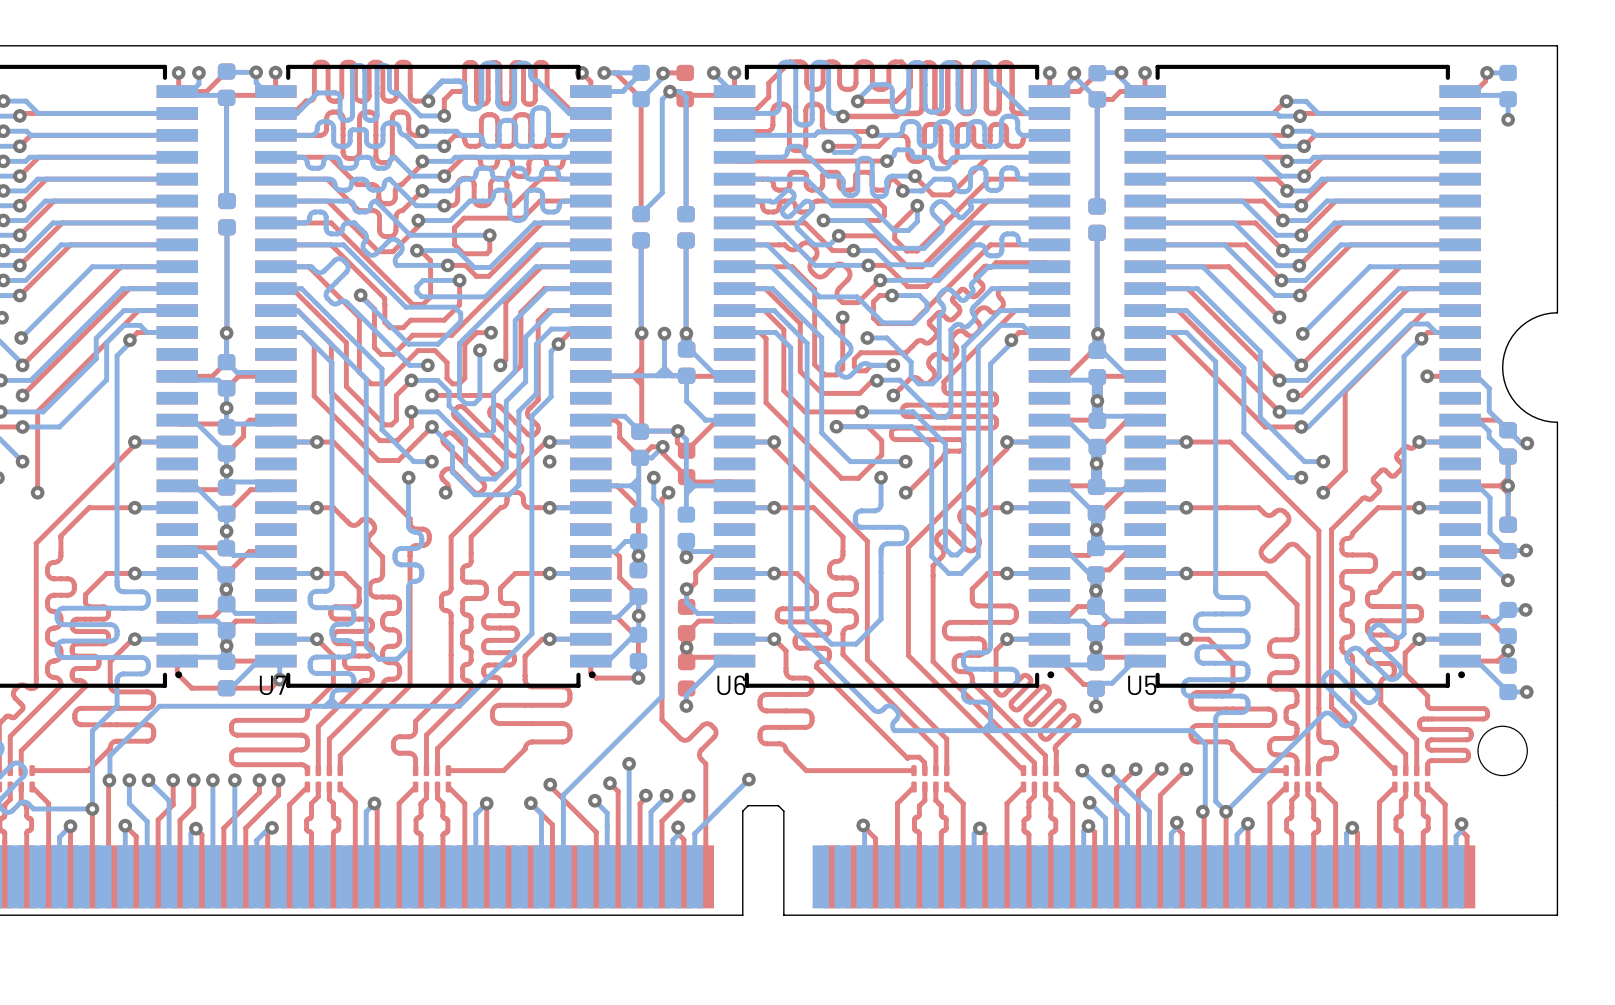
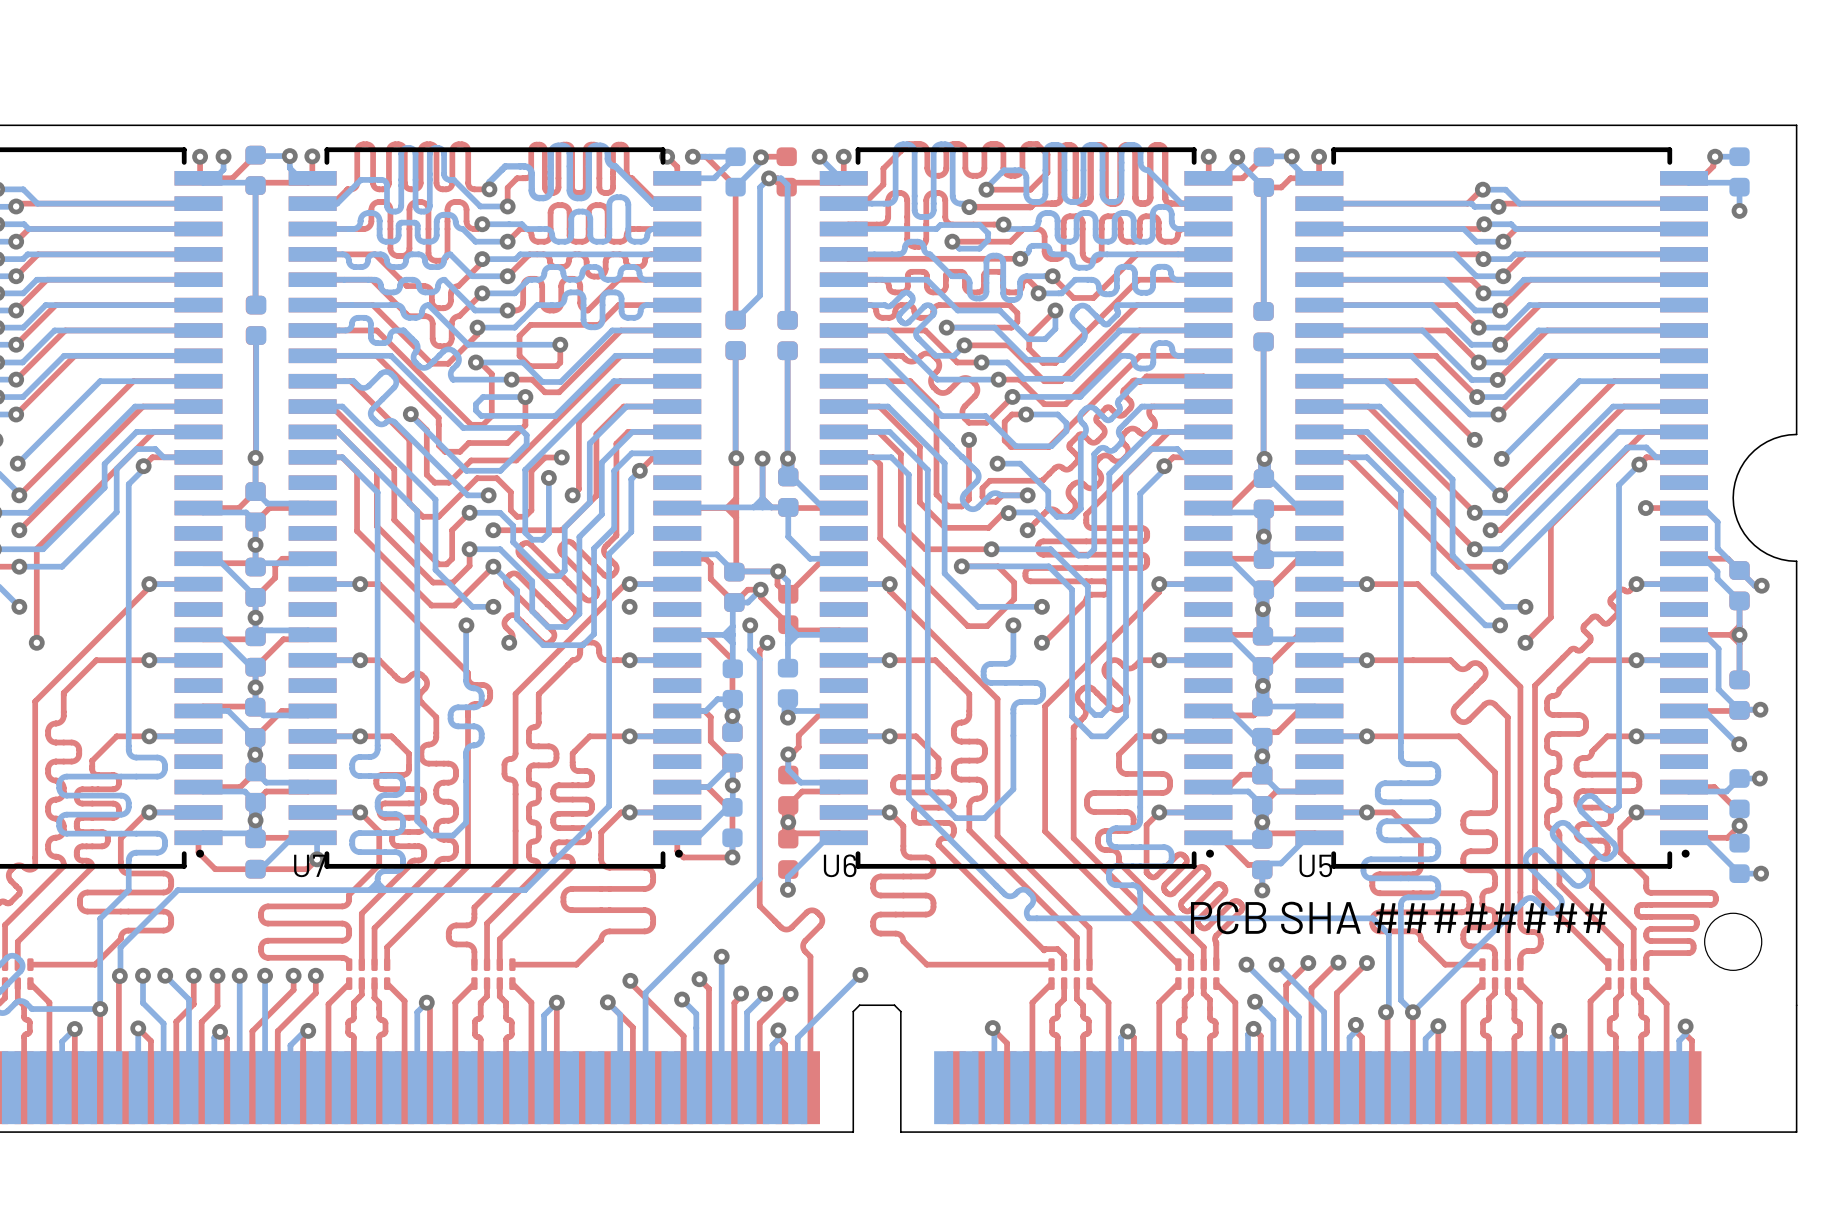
text: none -> PCB SHA ######## (1398, 917)

